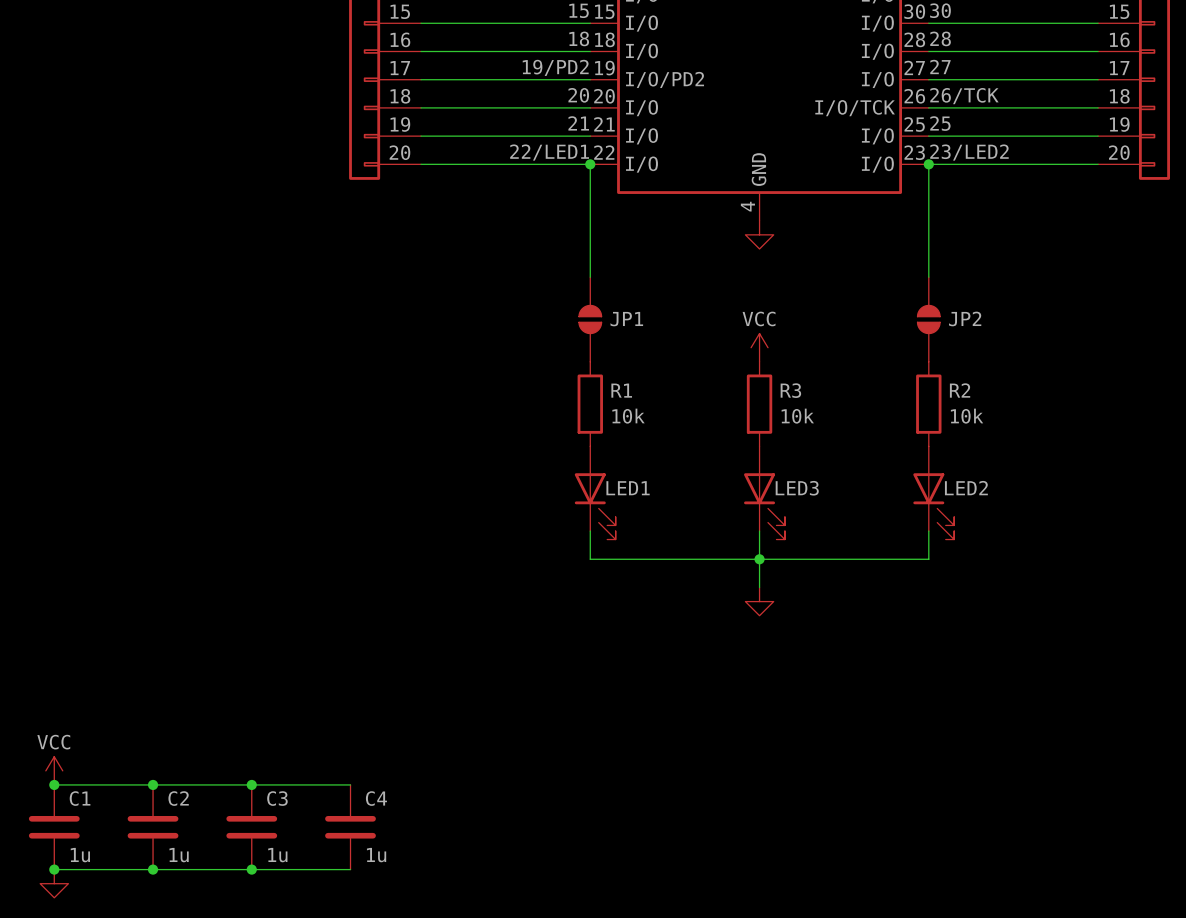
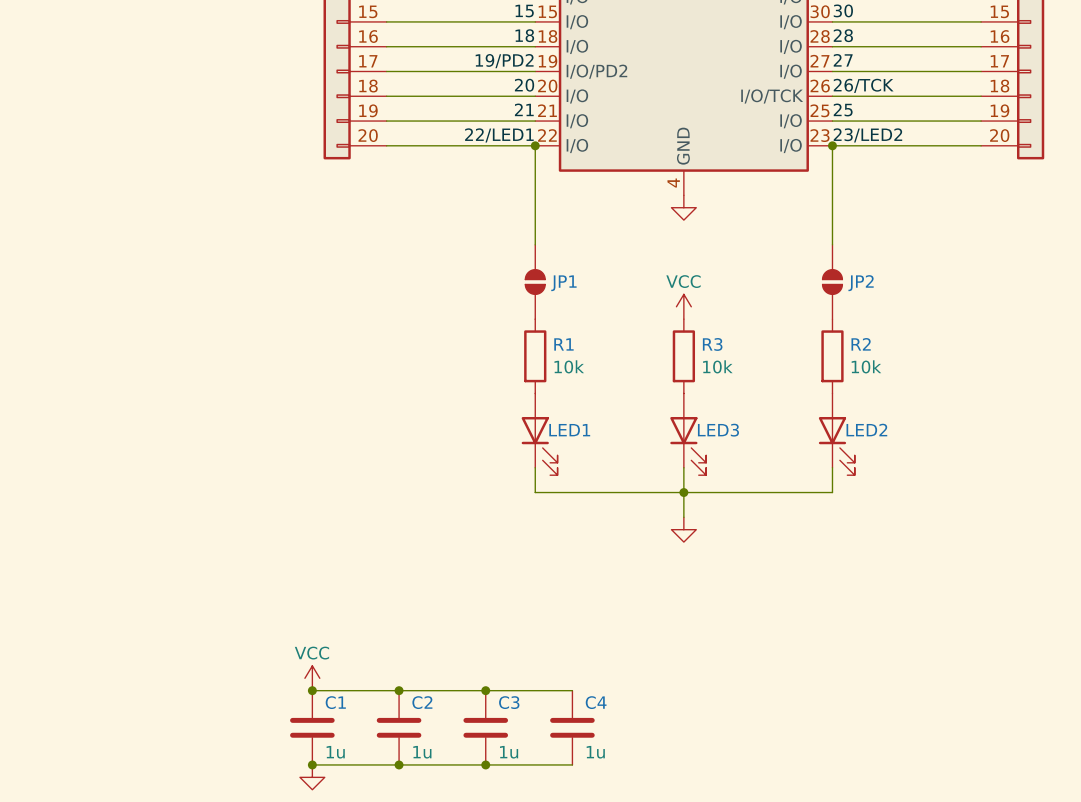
power symbol: VCC (54, 770) -> none
power symbol: none -> VCC (312, 678)
wire: (54, 784) (336, 784) -> none
junction: (54, 784) -> none
junction: (153, 784) -> none
junction: (251, 784) -> none
junction: none -> (312, 690)
wire: none -> (324, 690) (572, 690)
junction: none -> (399, 690)
junction: none -> (485, 690)
C1 position: (54, 827) -> (312, 727)
C2 position: (153, 827) -> (399, 727)
C3 position: (251, 827) -> (485, 727)
C4 position: (350, 827) -> (572, 727)
wire: (54, 869) (336, 869) -> none
junction: (54, 869) -> none
junction: (153, 869) -> none
junction: (251, 869) -> none
junction: none -> (312, 764)
wire: none -> (324, 764) (572, 764)
junction: none -> (399, 764)
junction: none -> (485, 764)
power symbol: (54, 883) -> none
power symbol: none -> (312, 777)

